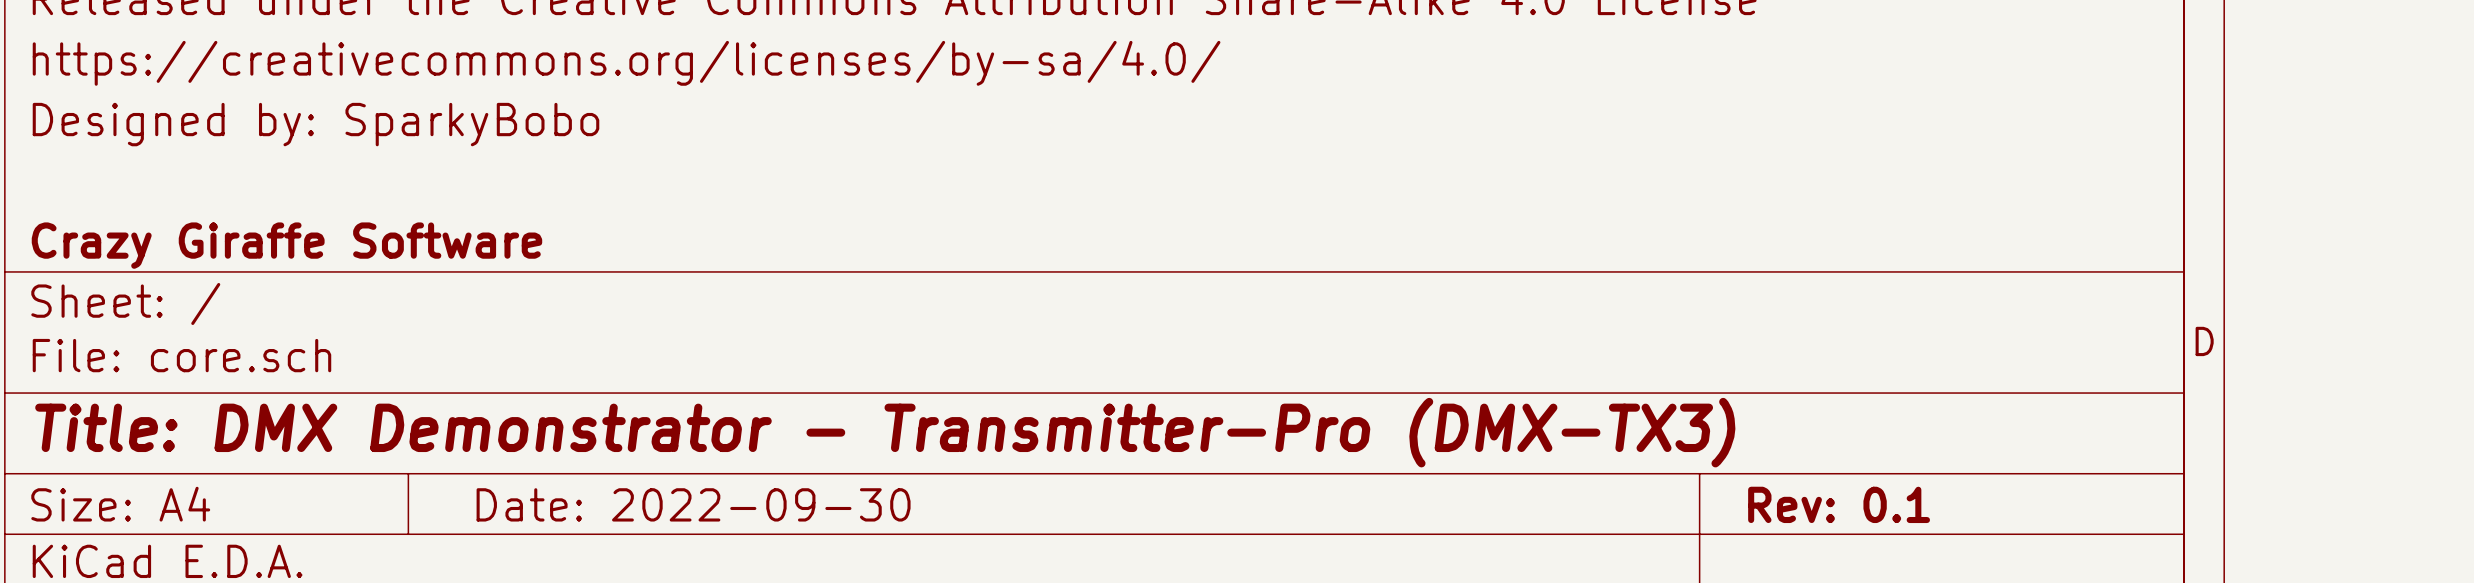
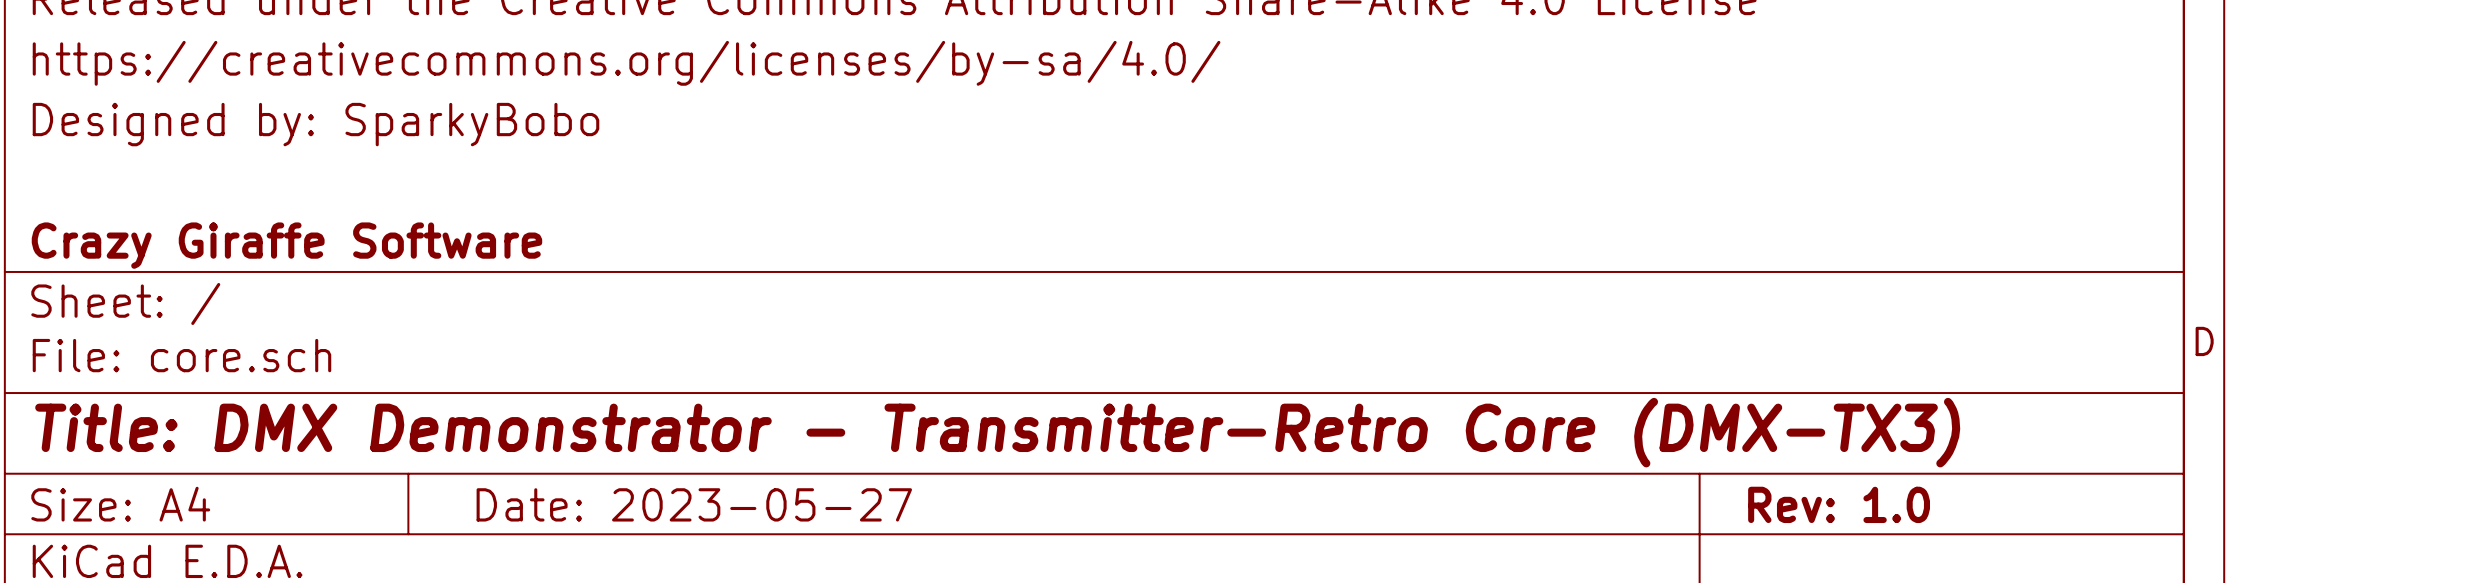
title block: Title: DMX Demonstrator - Transmitter-Pro (DMX-TX3) (885, 432) -> Title: DMX Demonstrator - Transmitter-Retro Core (DMX-TX3) (997, 432)
title block: Date: 2022-09-30 (693, 504) -> Date: 2023-05-27 (694, 504)
title block: Rev: 0.1 (1839, 504) -> Rev: 1.0 (1839, 504)

